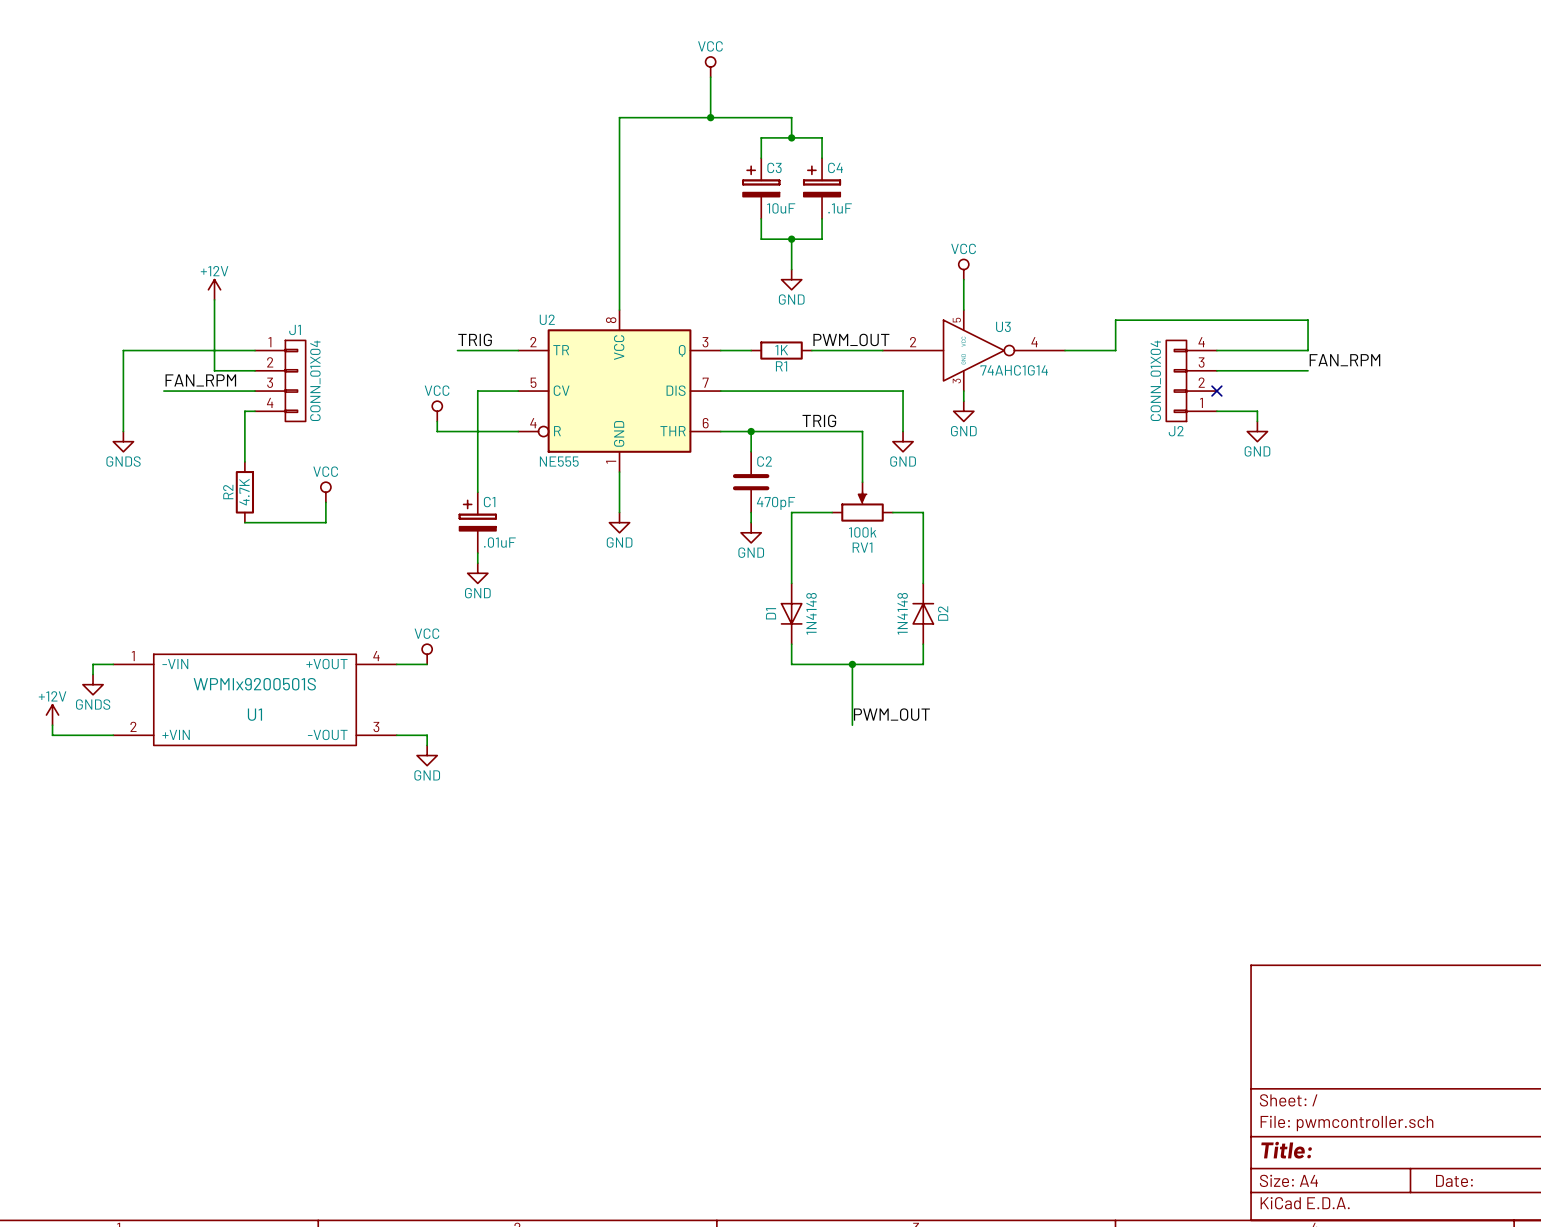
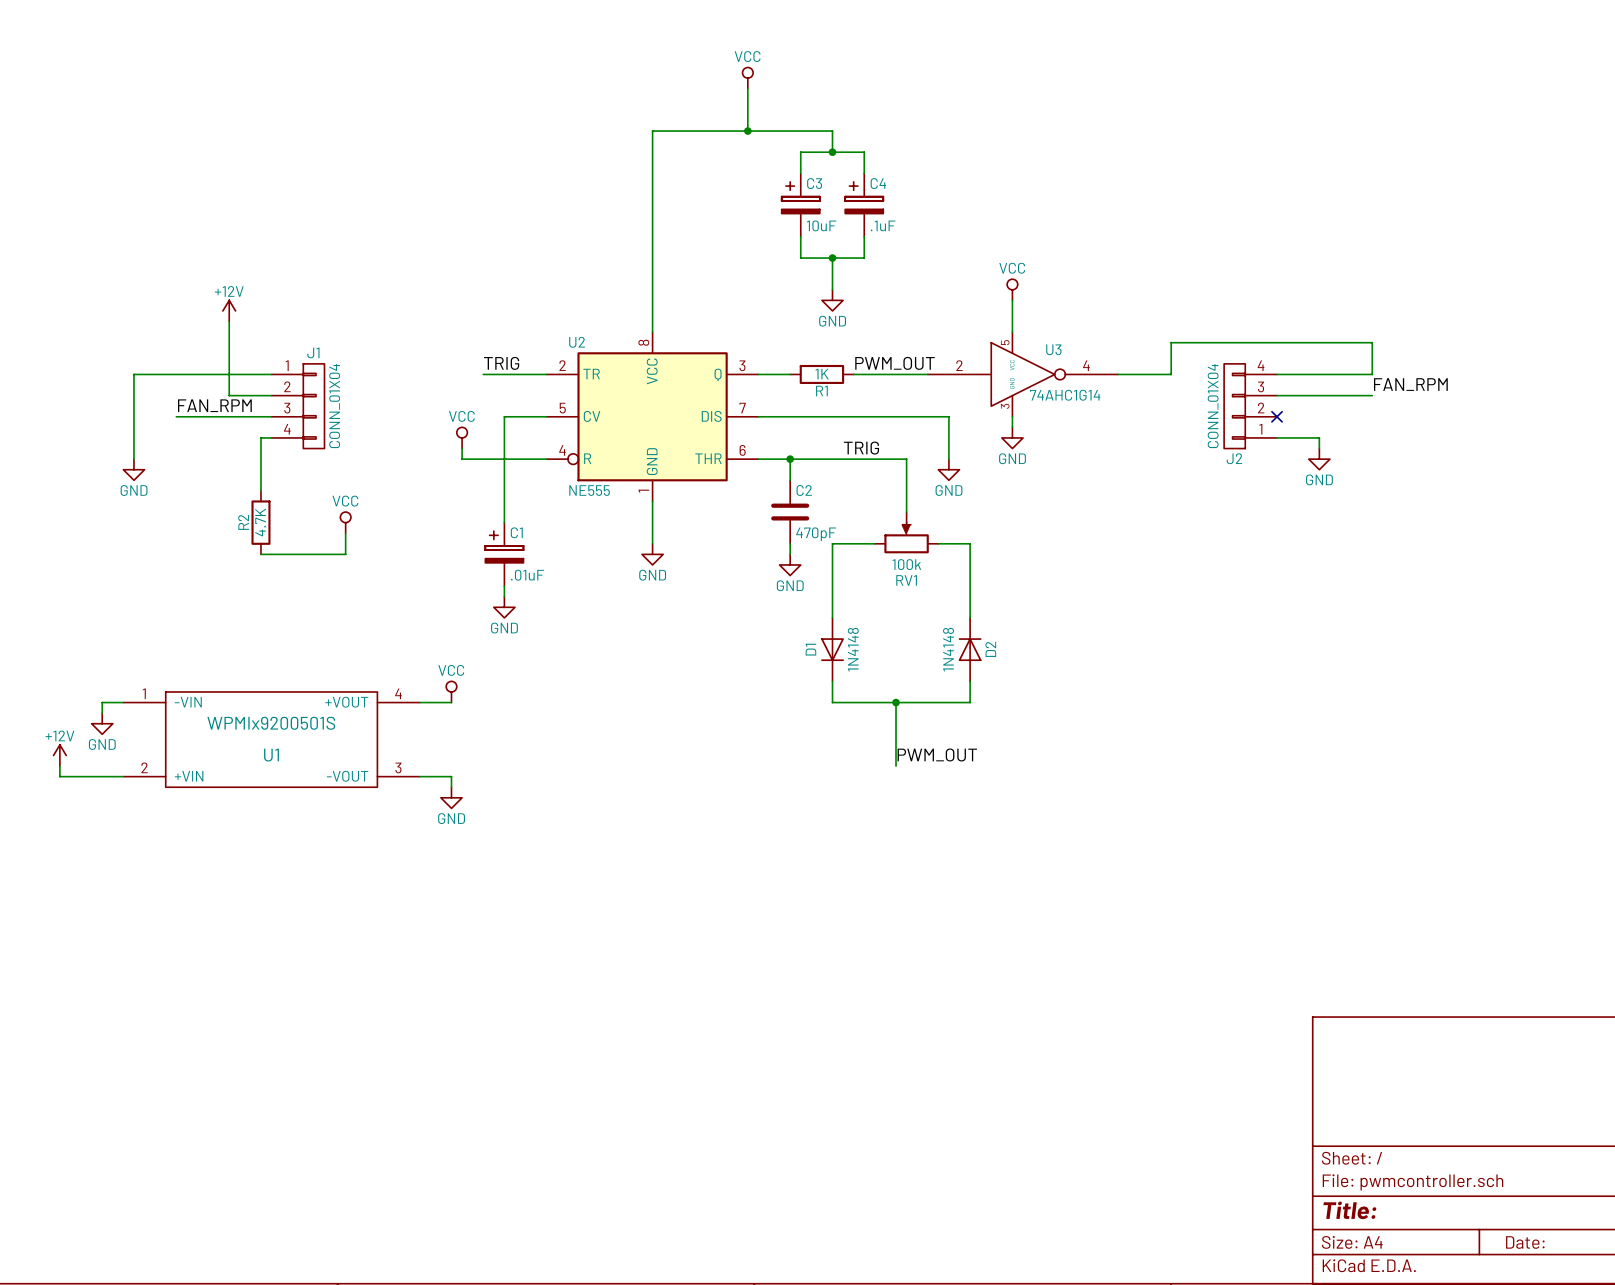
power symbol: GNDS (123, 441) -> GND (133, 469)
power symbol: GNDS (93, 684) -> GND (102, 723)

